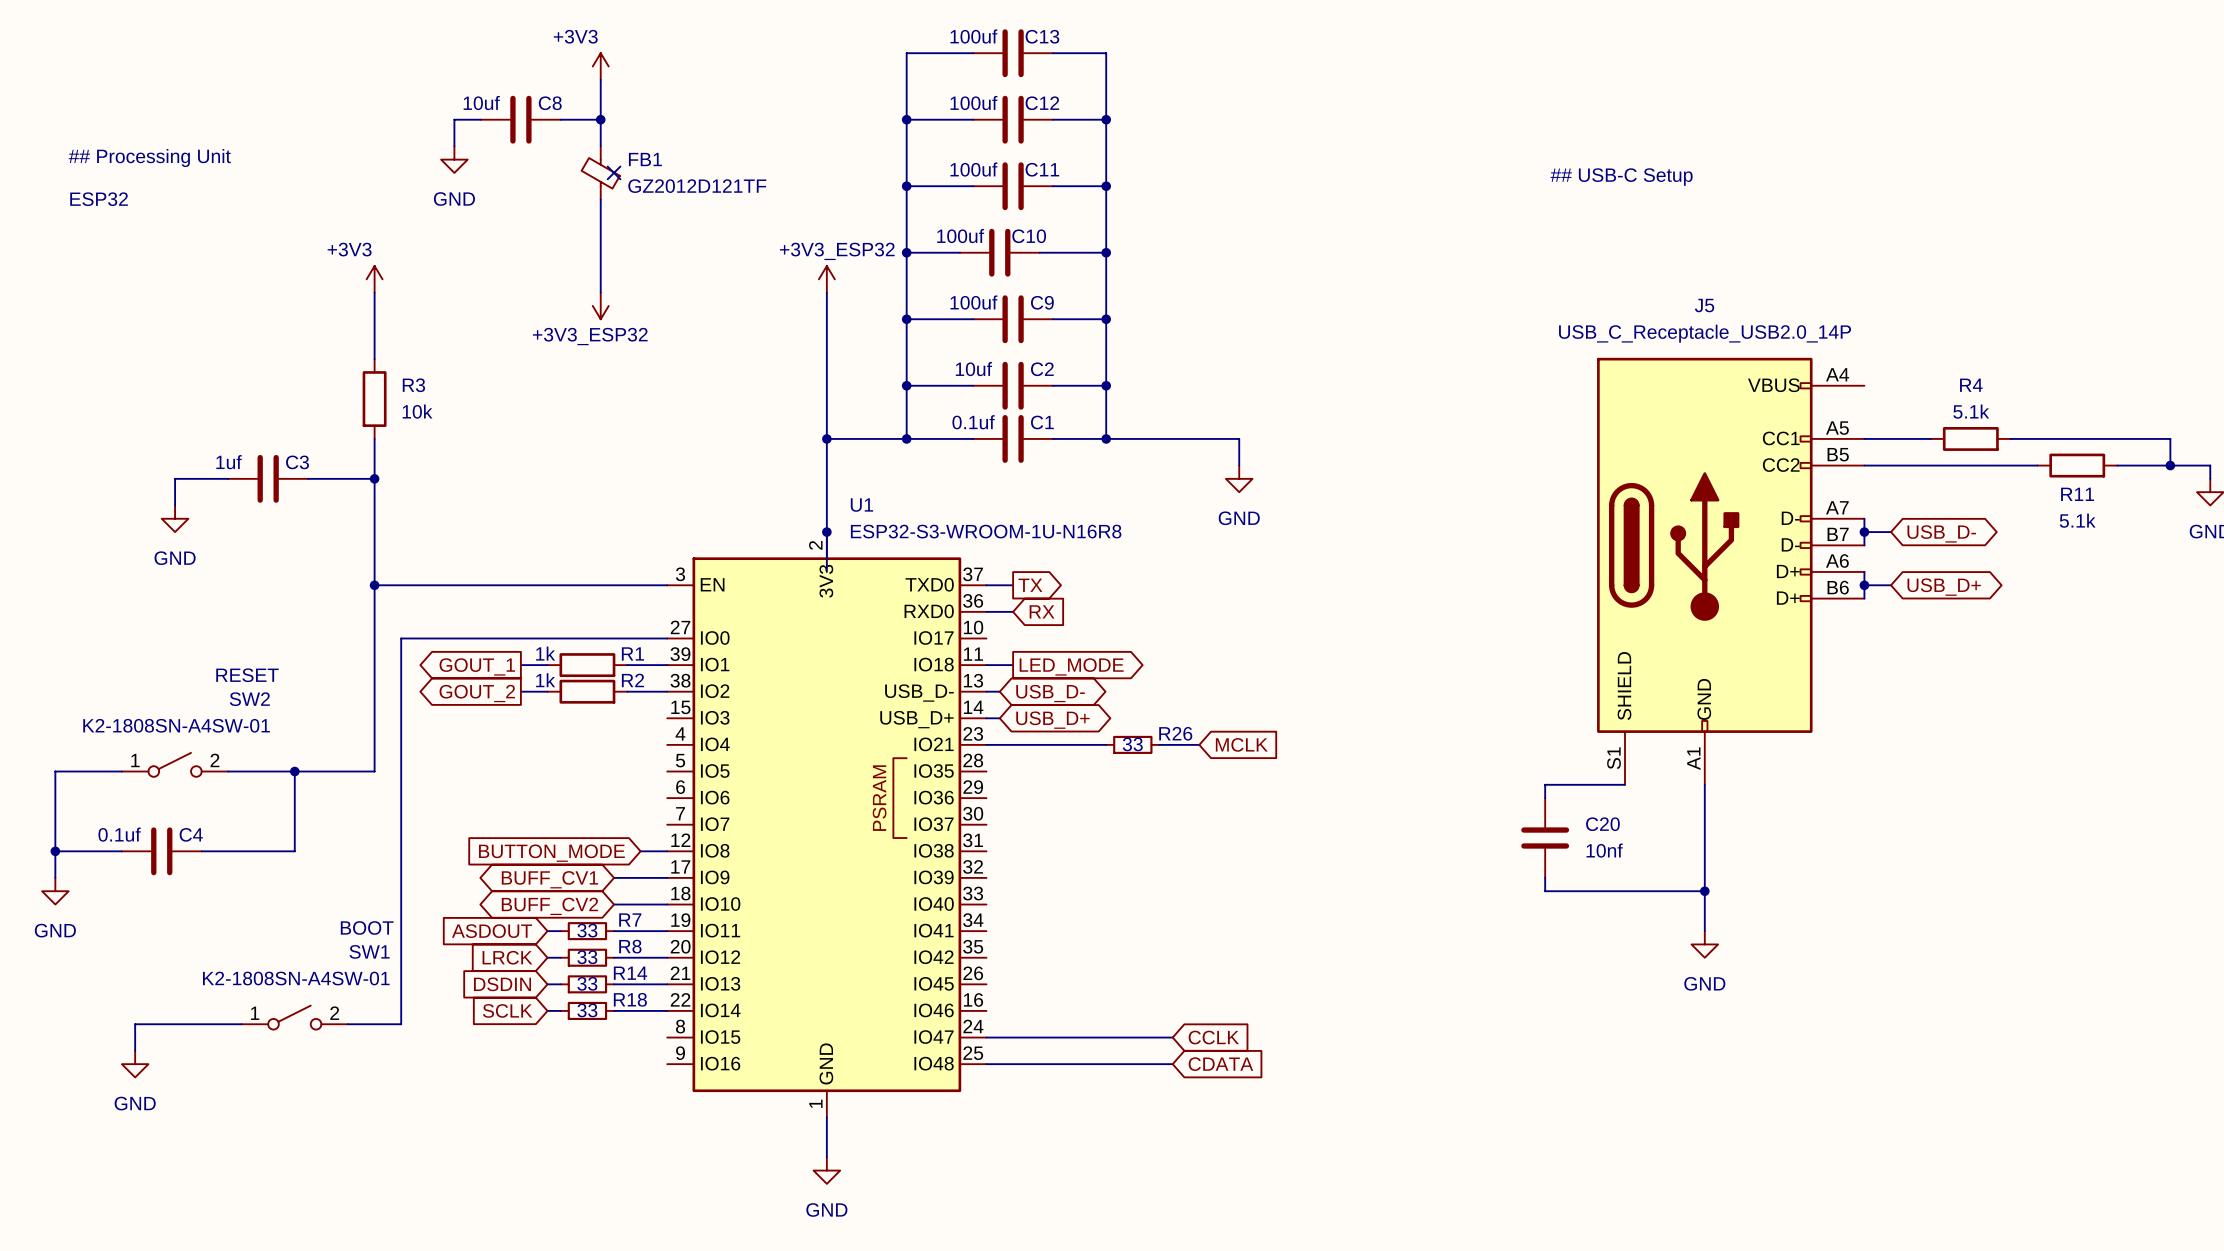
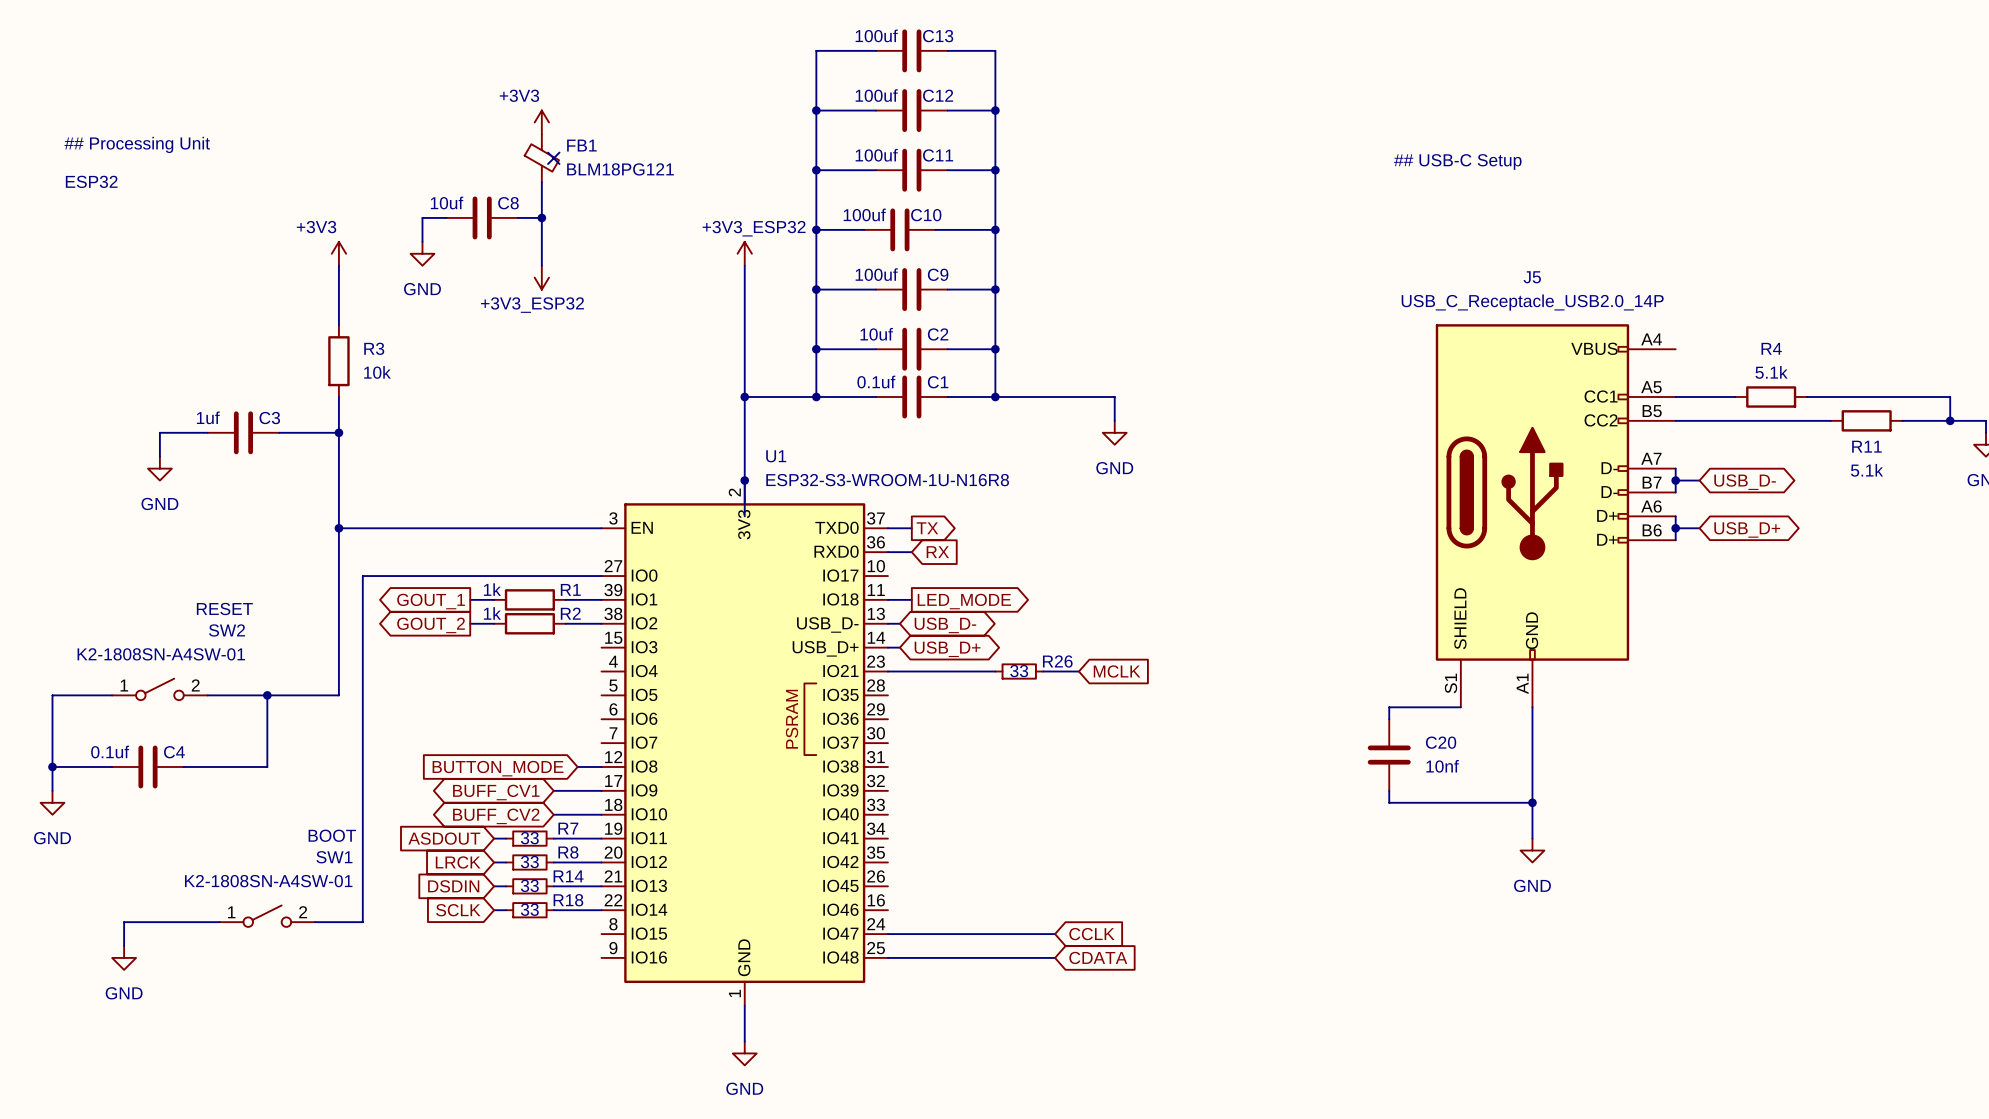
power symbol position: +3V3 (600, 66) -> +3V3 (541, 122)
wire: (600, 79) (600, 146) -> none
wire: (481, 119) (454, 119) (454, 146) -> (446, 217) (422, 217) (422, 241)
C8 position: (520, 119) -> (482, 217)
wire: (560, 119) (600, 119) -> none
junction: (600, 119) -> none
power symbol position: GND (454, 159) -> GND (422, 253)
FB1 rotation: 0° (600, 173) -> 180° (541, 157)
FB1 value: GZ2012D121TF (697, 186) -> BLM18PG121 (620, 169)
wire: none -> (517, 217) (541, 217)
junction: none -> (541, 217)

